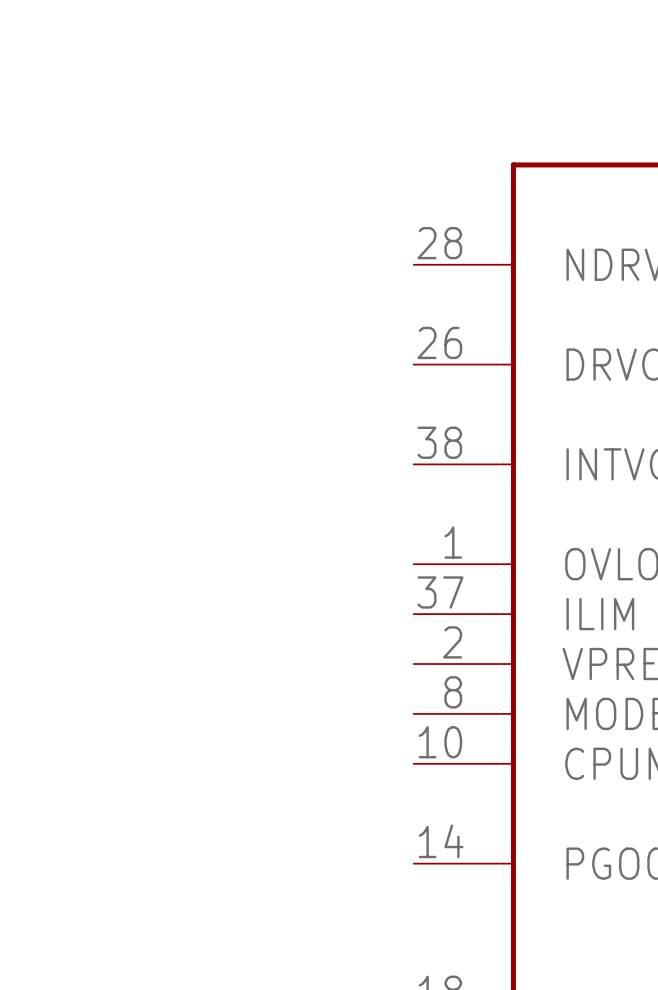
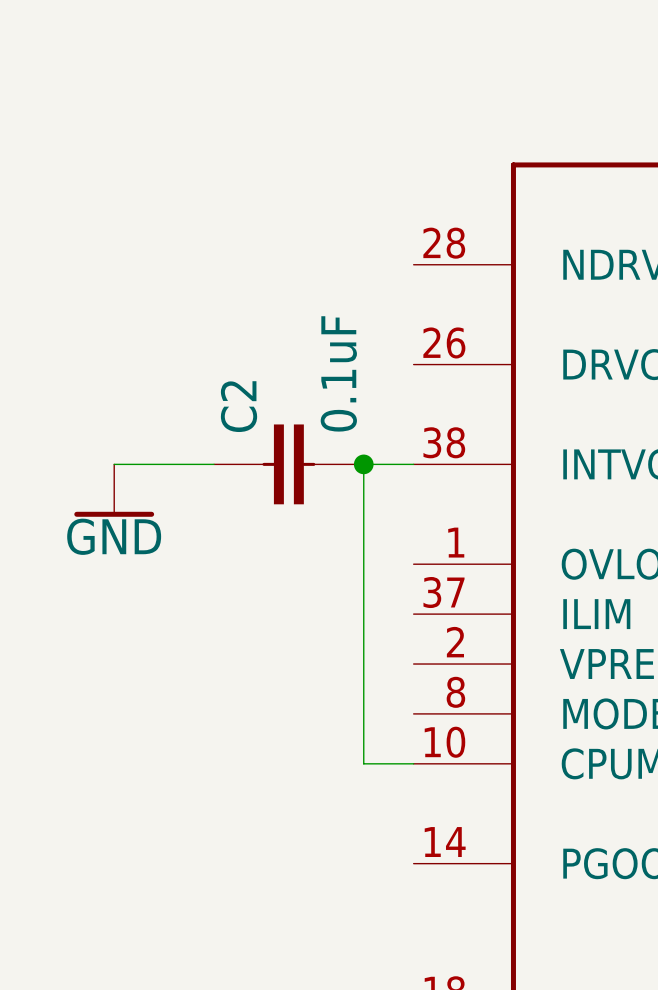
wire: none -> (114, 464) (214, 464)
C2: none -> 0.1uF (288, 464)
junction: none -> (363, 464)
wire: none -> (413, 464) (363, 464) (363, 763) (413, 763)
power symbol: none -> GND (114, 490)

